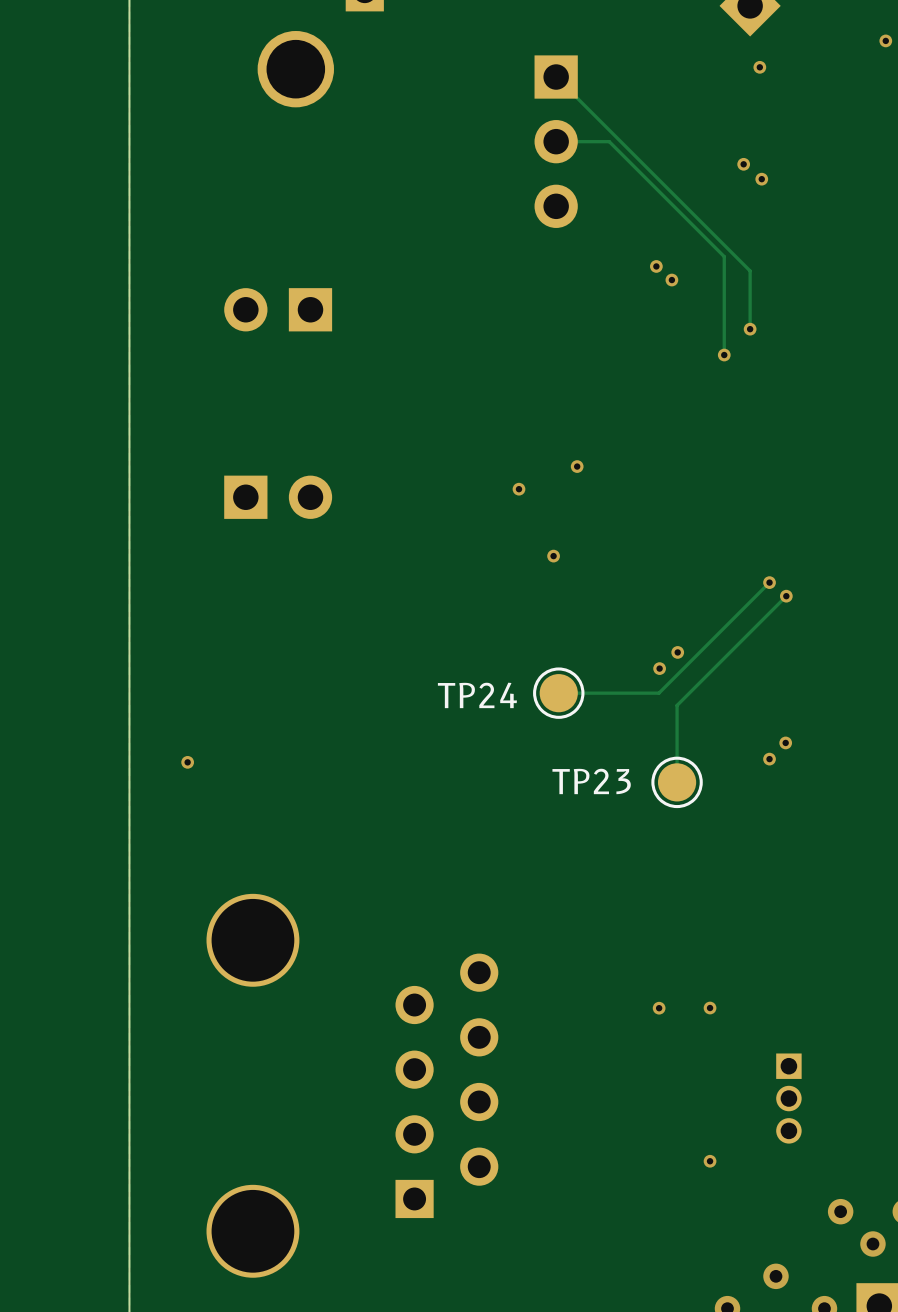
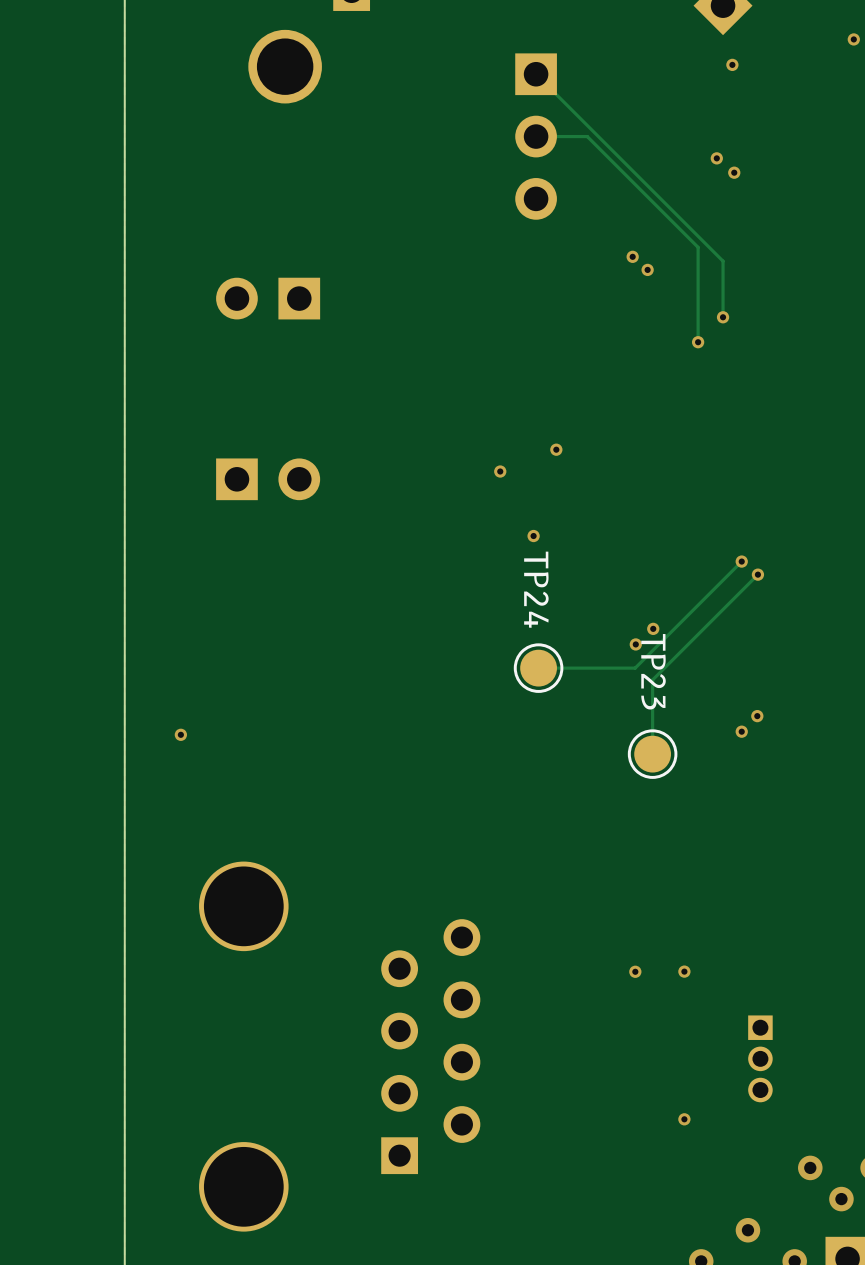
TP24 name rotation: 0° (477, 695) -> 90° clockwise (536, 589)
TP24 name position: TP24 (477, 695) -> TP24 (536, 589)
TP23 name rotation: 0° (591, 781) -> 90° clockwise (653, 671)
TP23 name position: TP23 (591, 781) -> TP23 (653, 671)

